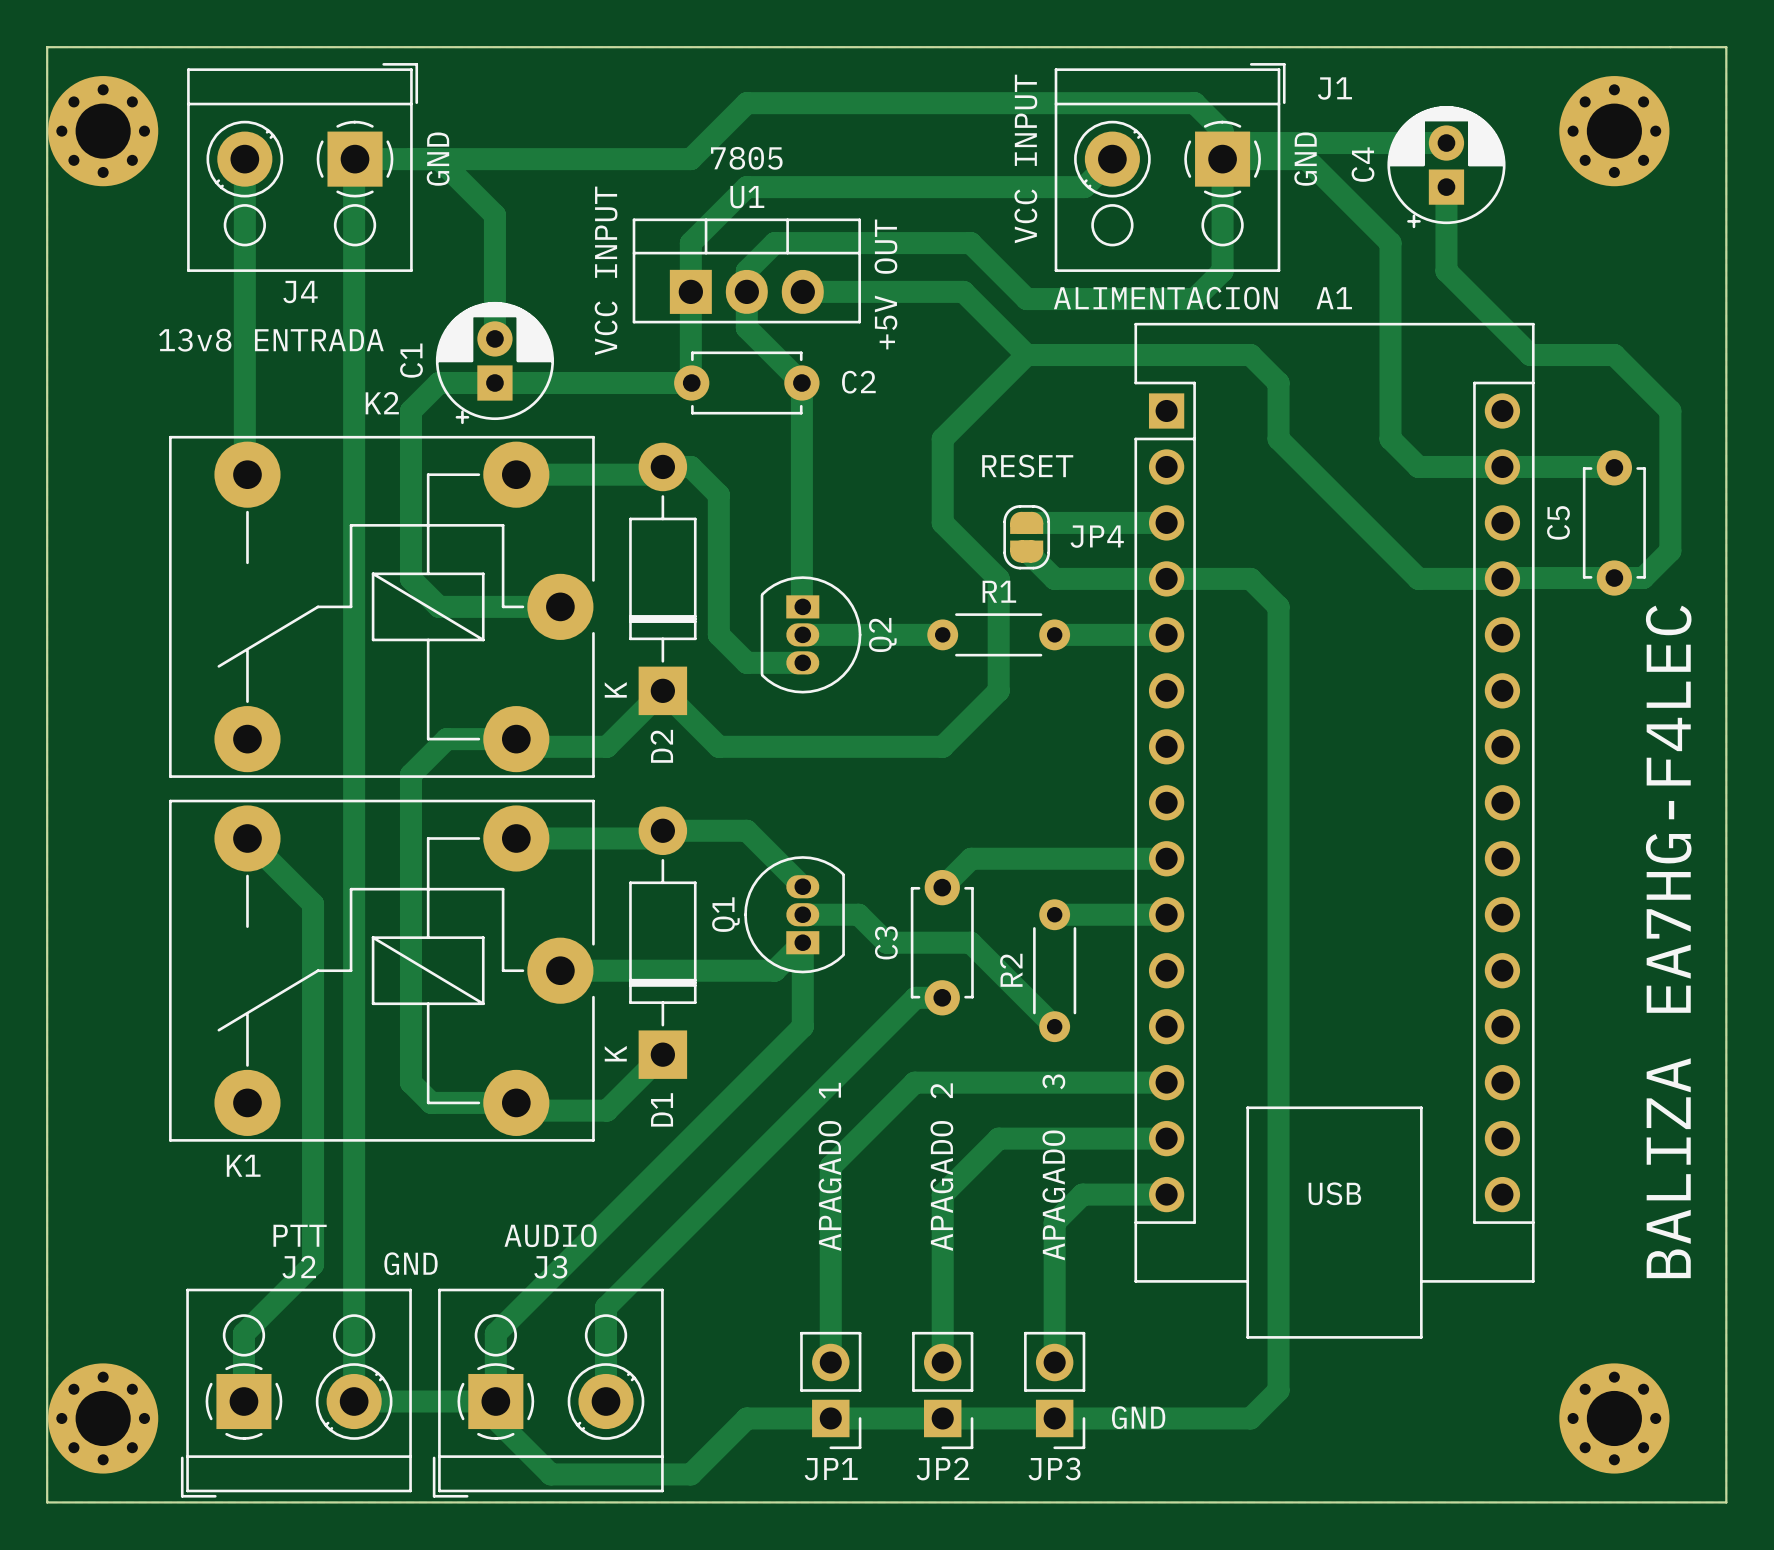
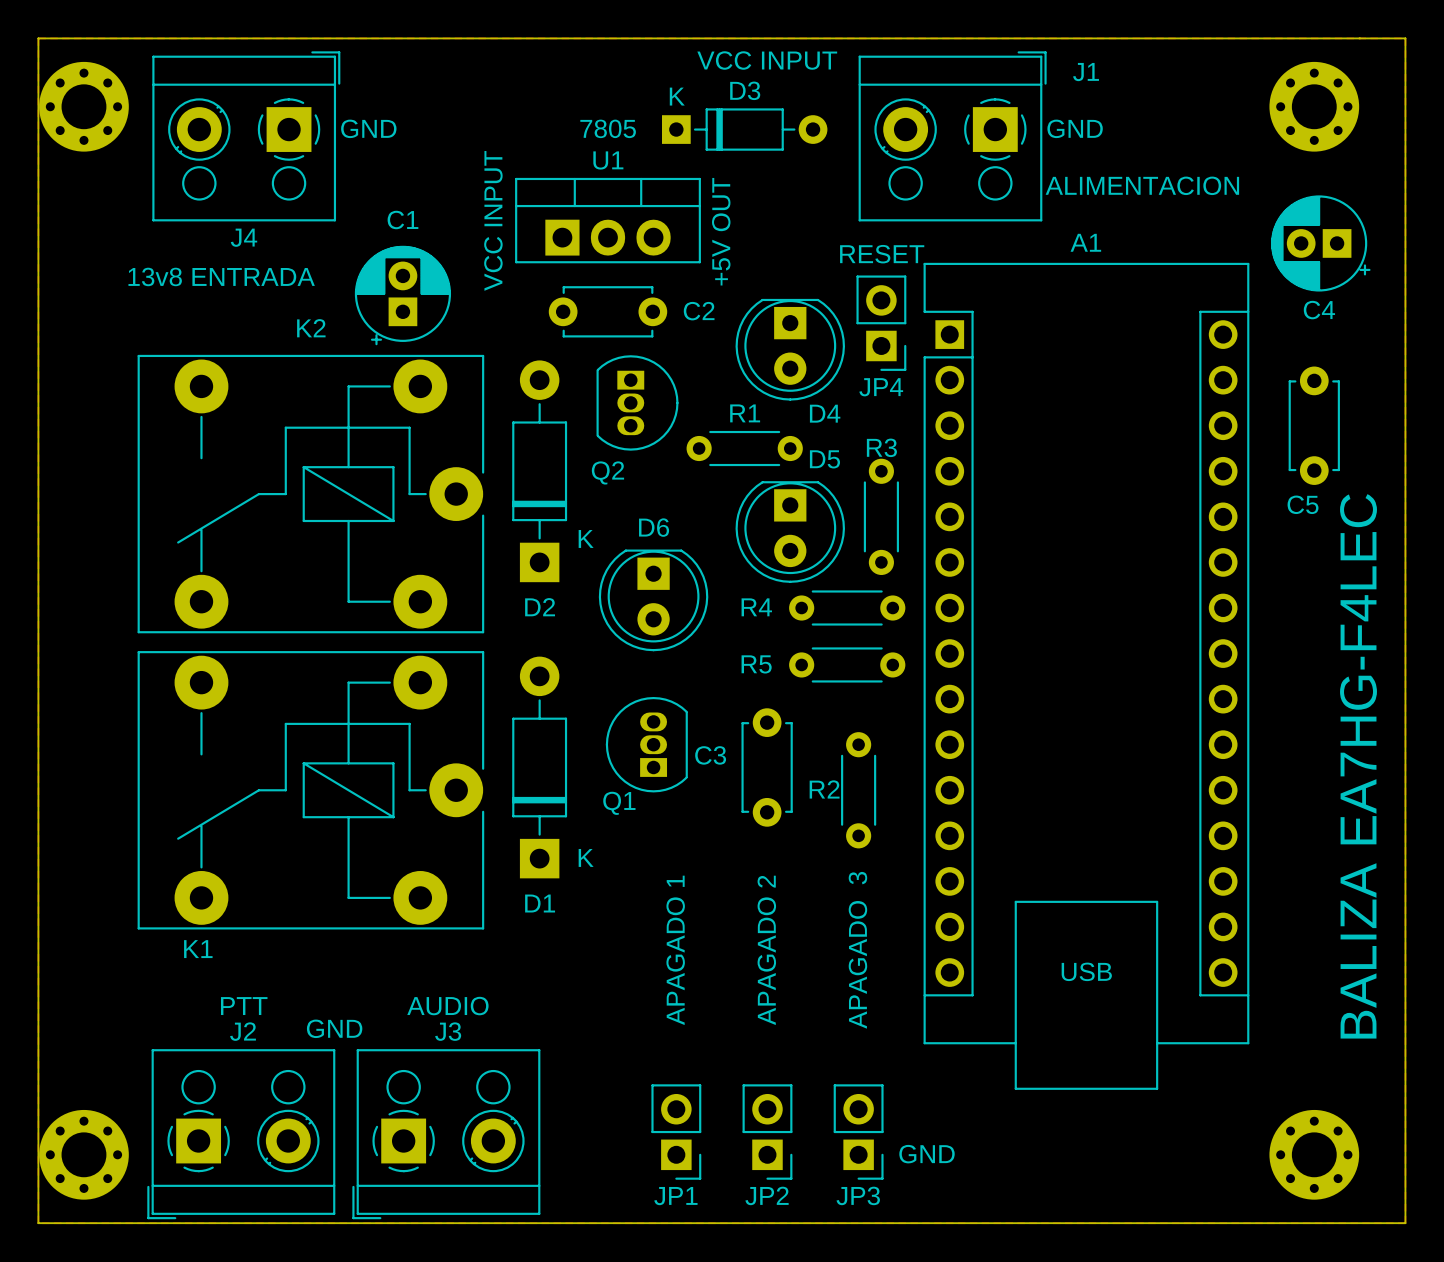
track: (1446, 143) (1238, 143) (1222, 159) (1306, 159) (1390, 243) (1390, 438) (1418, 466) (1614, 467) -> none
text rotation: 0° (1025, 158) -> 90° clockwise (767, 60)
track: (244, 159) (244, 472) -> none
track: (438, 159) (494, 215) (494, 338) -> none
text rotation: 0° (438, 159) -> 90° clockwise (368, 128)
D3: none -> (744, 129)
track: (1112, 159) (1084, 187) (746, 187) (690, 243) (691, 383) (438, 383) (410, 410) (410, 578) (438, 606) (560, 606) -> none
text rotation: 0° (1305, 159) -> 90° clockwise (1075, 128)
C4 rotation: 0° (1446, 167) -> 90° counterclockwise (1320, 243)
C4 position: (1446, 167) -> (1320, 243)
track: (1446, 187) (1446, 271) (1530, 355) (1614, 355) (1670, 410) (1670, 550) (1643, 578) (1418, 578) (1278, 438) (1278, 383) (1250, 355) (1026, 355) -> none
track: (802, 291) (963, 291) (1026, 355) -> none
text position: ALIMENTACION (1165, 298) -> ALIMENTACION (1142, 185)
track: (1026, 355) (942, 438) (942, 522) (998, 578) (998, 690) (942, 746) (718, 746) (662, 690) (606, 746) (524, 746) (516, 739) (446, 739) (410, 774) (410, 1082) (431, 1102) (516, 1102) (524, 1110) (606, 1110) (662, 1054) -> none
C1 name rotation: 0° (411, 360) -> 90° clockwise (402, 220)
C1 name position: C1 (411, 360) -> C1 (402, 220)
D4: none -> (790, 349)
text position: RESET (1027, 466) -> RESET (882, 254)
track: (516, 474) (655, 474) (662, 466) (690, 466) (718, 494) (718, 634) (746, 662) (802, 662) -> none
JP4 footprint: [1003, 505, 1051, 570] -> [856, 275, 907, 371]
track: (1026, 522) (1166, 522) -> none
C5 name rotation: 0° (1558, 522) -> 90° clockwise (1303, 504)
C5 name position: C5 (1558, 522) -> C5 (1303, 504)
JP4 name position: JP4 (1097, 536) -> JP4 (881, 387)
track: (1026, 551) (1054, 578) (1250, 578) (1278, 606) (1278, 1390) (1250, 1418) (746, 1418) (690, 1474) (550, 1474) (495, 1419) (495, 1333) (802, 1026) (802, 942) (774, 970) (560, 970) -> none
track: (802, 606) (801, 383) (746, 327) (746, 271) (774, 243) (970, 243) (1026, 299) (1194, 299) (1222, 271) (1222, 131) (1194, 103) (746, 103) (690, 159) (354, 160) (354, 1401) (495, 1401) -> none
track: (802, 634) (942, 634) -> none
Q2 position: (811, 634) -> (637, 402)
Q2 name rotation: 0° (882, 634) -> 90° clockwise (607, 472)
Q2 name position: Q2 (882, 634) -> Q2 (607, 472)
R1 position: (998, 634) -> (744, 448)
track: (1054, 634) (1166, 634) -> none
R3: none -> (881, 516)
D5: none -> (790, 532)
D2 text rotation: 0° (615, 689) -> 90° clockwise (586, 538)
D2 text position: K (615, 689) -> K (586, 538)
D6: none -> (653, 600)
D2 name rotation: 0° (661, 746) -> 90° clockwise (540, 607)
R4: none -> (847, 608)
R5: none -> (847, 664)
track: (247, 838) (313, 904) (313, 1264) (243, 1333) (243, 1401) -> none
track: (516, 838) (655, 838) (662, 830) (746, 830) (802, 886) -> none
track: (1166, 858) (971, 858) (942, 887) -> none
Q1 name rotation: 0° (725, 914) -> 90° clockwise (619, 803)
Q1 name position: Q1 (725, 914) -> Q1 (619, 803)
track: (802, 914) (858, 914) (886, 942) (970, 942) (1054, 1026) -> none
track: (1054, 914) (1166, 914) -> none
C3 name rotation: 0° (886, 942) -> 90° clockwise (710, 755)
R2 name rotation: 0° (1011, 970) -> 90° clockwise (824, 789)
track: (942, 997) (915, 997) (606, 1307) (606, 1401) -> none
D1 text rotation: 0° (615, 1053) -> 90° clockwise (586, 857)
D1 text position: K (615, 1053) -> K (586, 857)
track: (1166, 1082) (914, 1082) (830, 1166) (830, 1362) -> none
D1 name rotation: 0° (662, 1109) -> 90° clockwise (540, 903)
track: (1166, 1138) (998, 1138) (942, 1194) (942, 1362) -> none
track: (1166, 1194) (1082, 1194) (1054, 1222) (1054, 1362) -> none

